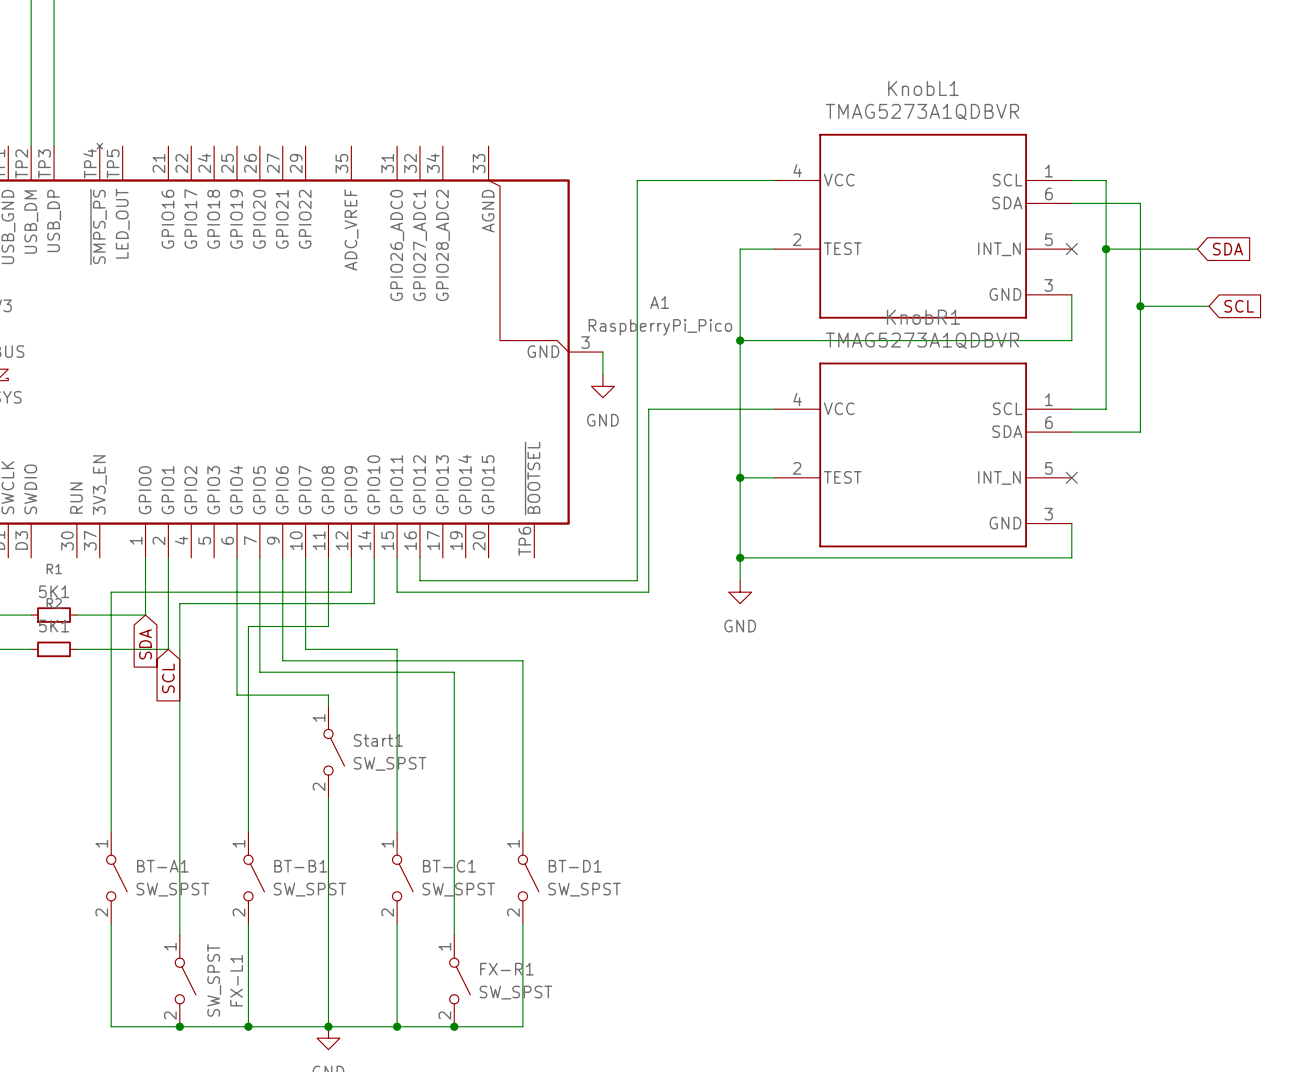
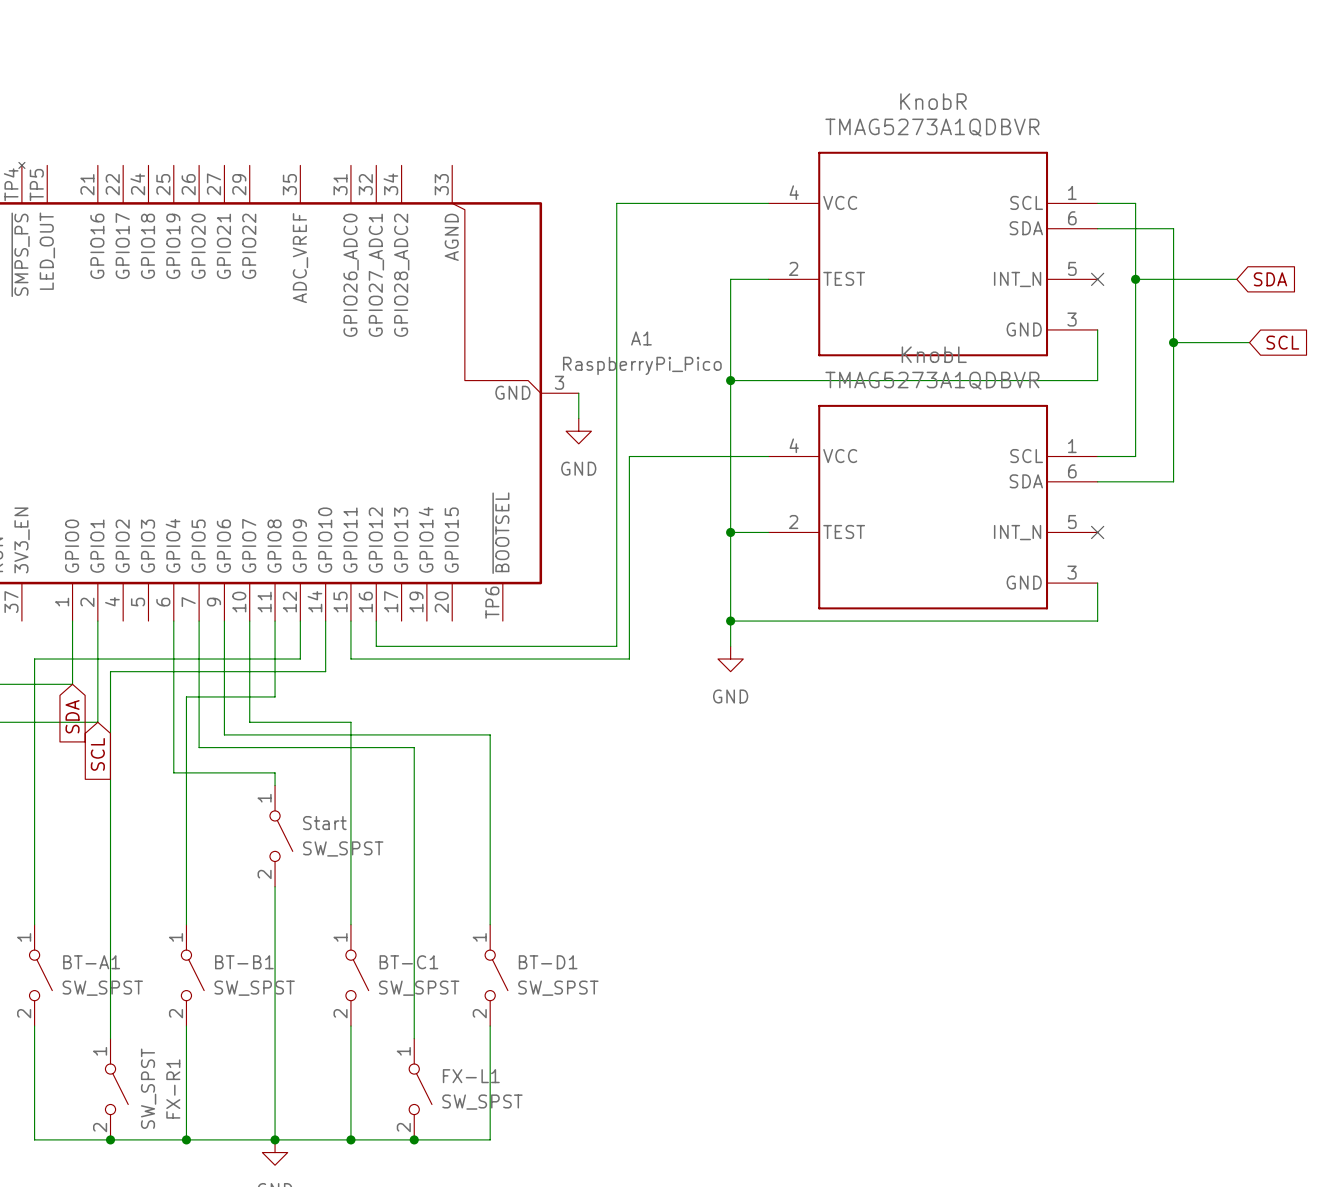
KnobL1 name: KnobL1 (923, 88) -> KnobR (933, 101)
KnobR1 name: KnobR1 (923, 317) -> KnobL (934, 354)
Start1 name: Start1 (378, 740) -> Start (324, 823)
FX-R1 name: FX-R1 (506, 969) -> FX-L1 (471, 1076)
FX-L1 name: FX-L1 (236, 980) -> FX-R1 (173, 1088)

